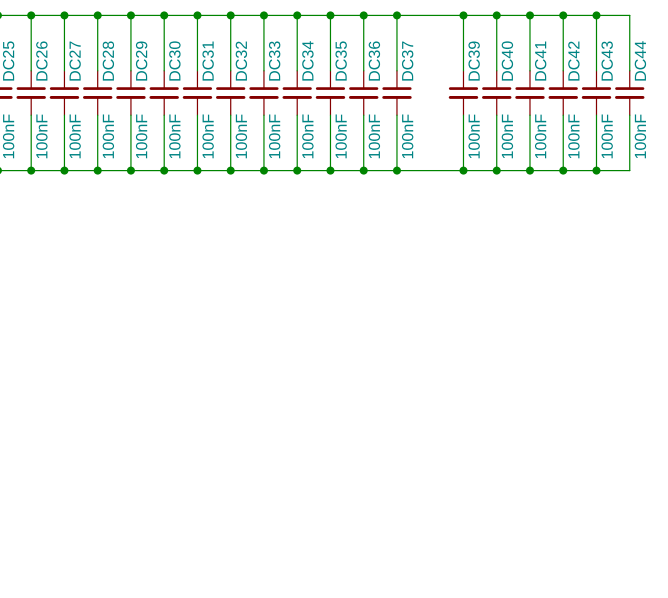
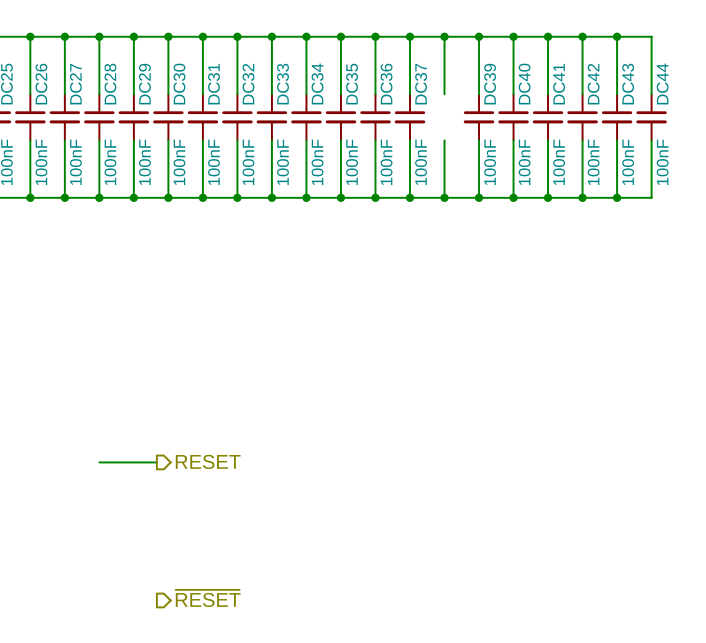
wire: none -> (444, 36) (444, 94)
junction: none -> (444, 36)
wire: none -> (444, 140) (444, 197)
junction: none -> (444, 197)
wire: none -> (99, 462) (156, 462)
hierarchical label: none -> RESET (208, 461)
hierarchical label: none -> ~{RESET} (208, 598)

